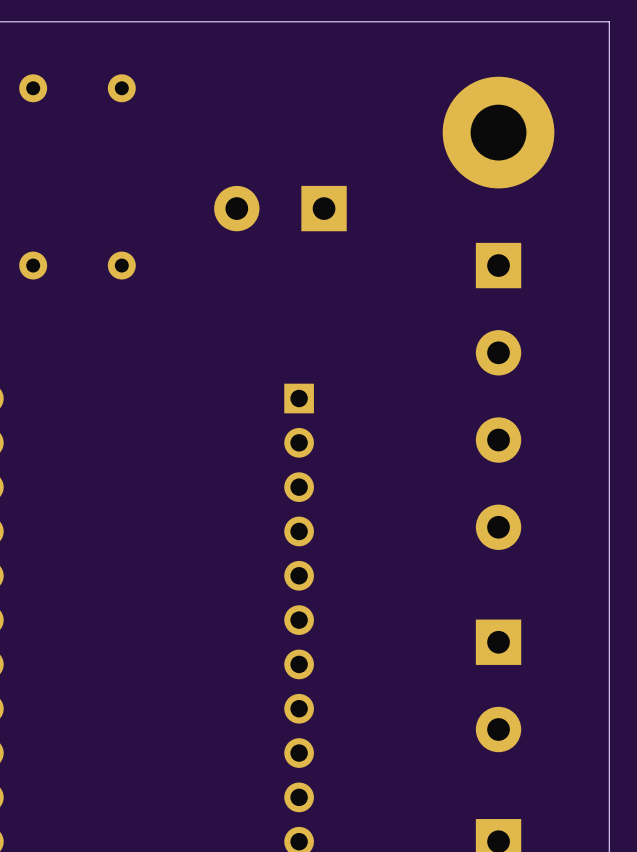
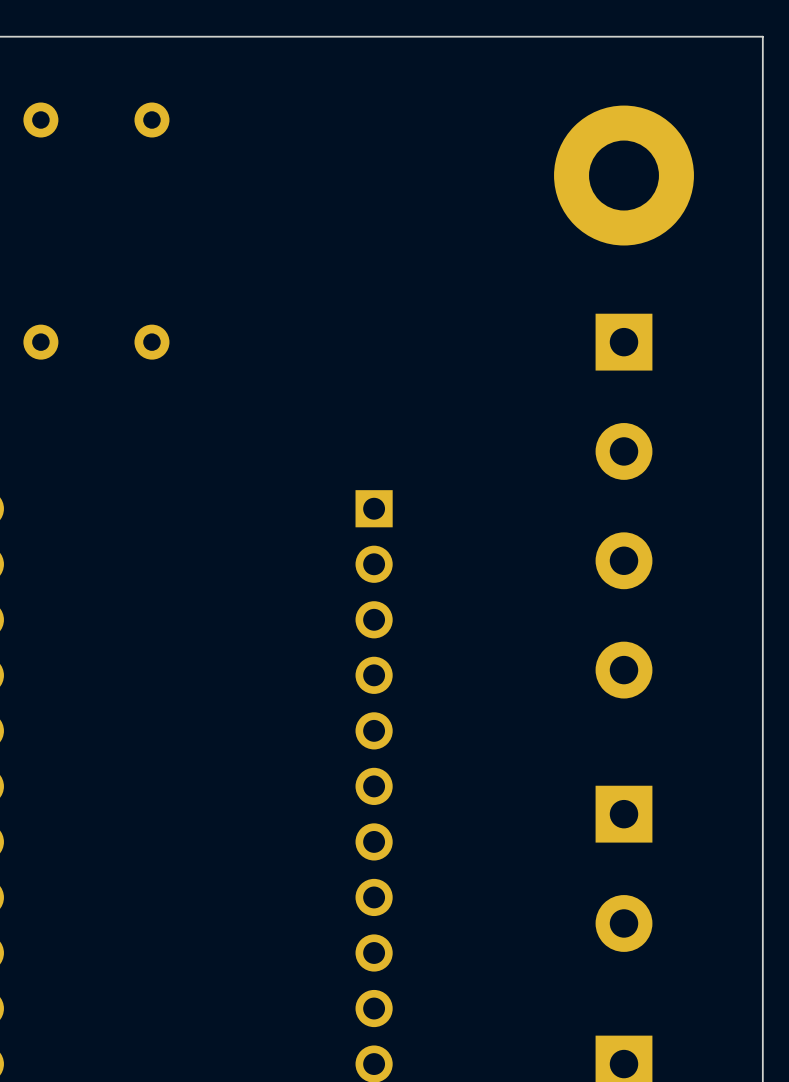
part: (280, 208) -> none

